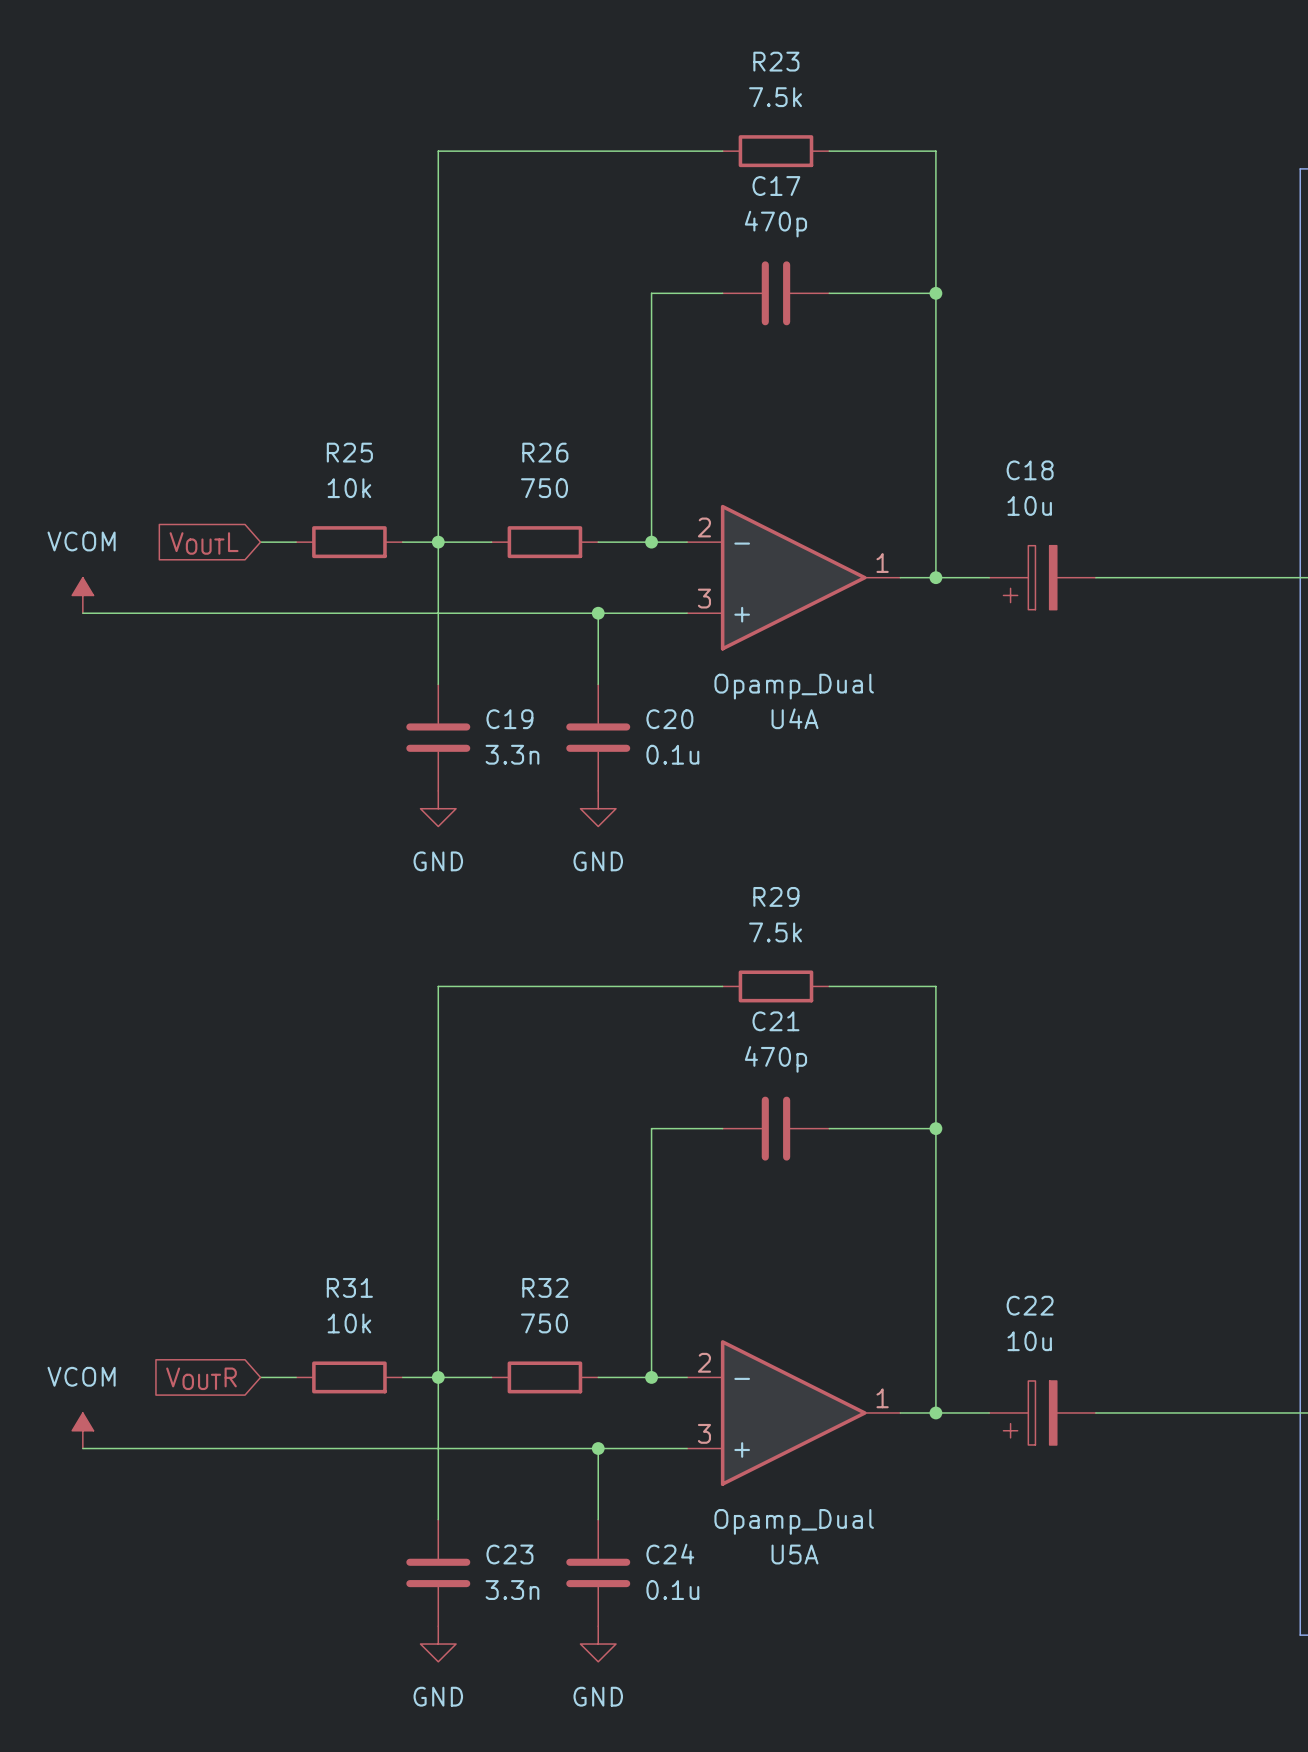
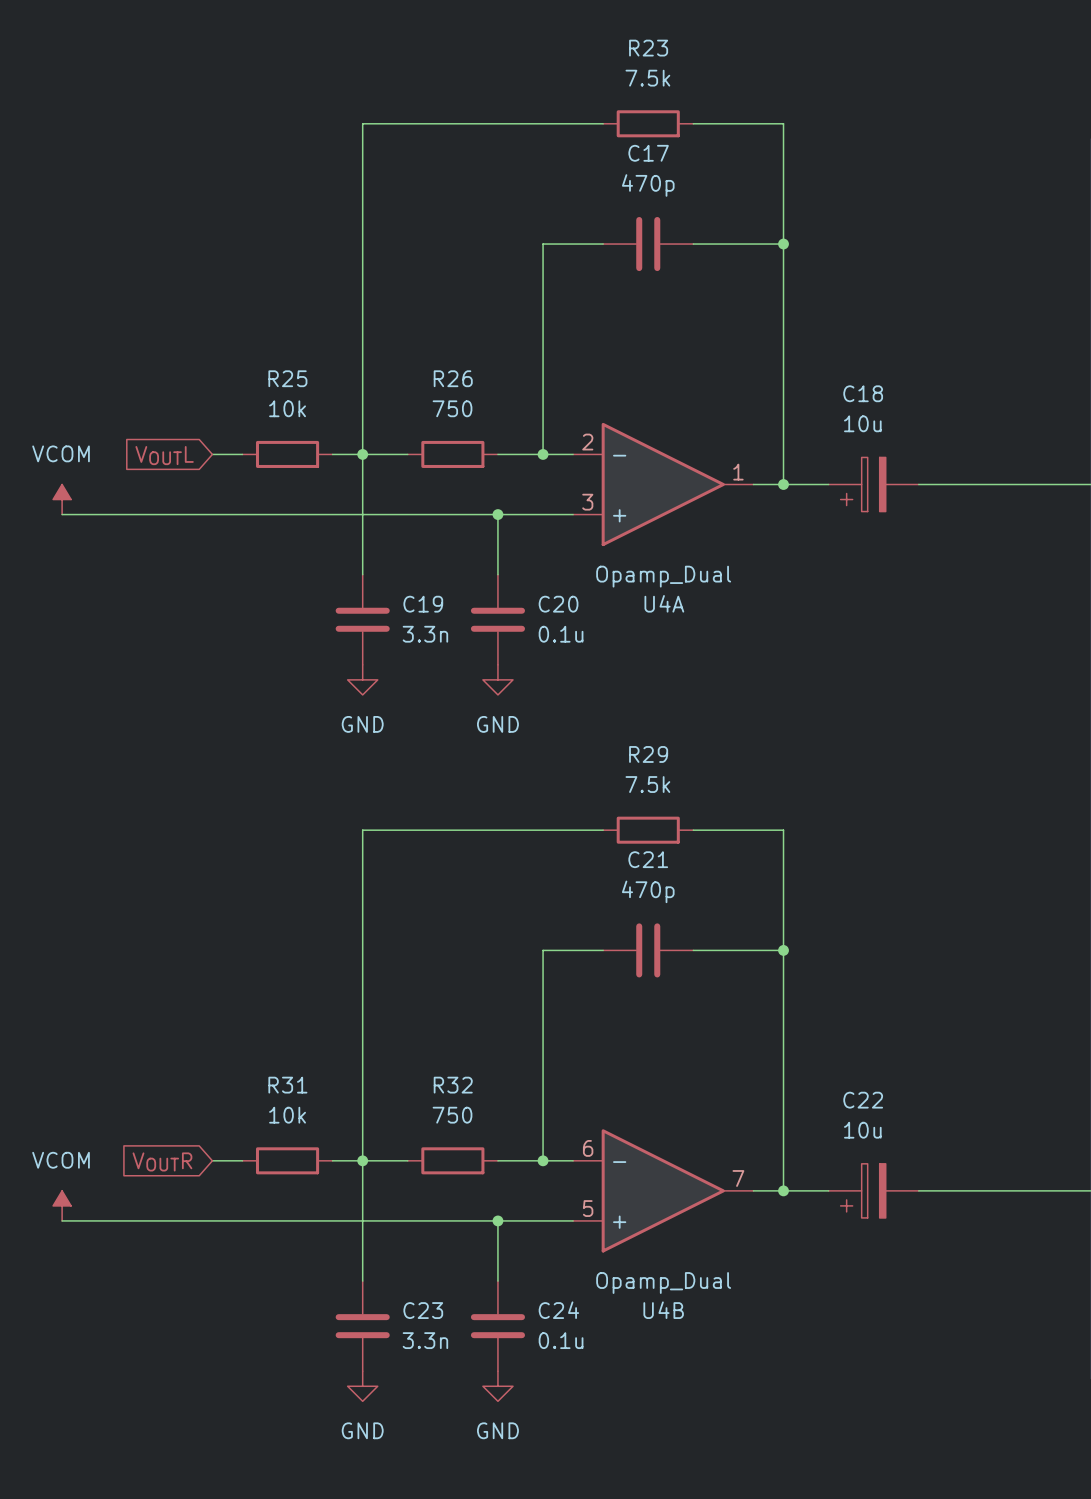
U5A pin number: 2 (704, 1362) -> 6 (588, 1148)
U5A pin number: 1 (882, 1398) -> 7 (738, 1178)
U5A pin number: 3 (704, 1433) -> 5 (588, 1208)
U5A name: U5A (795, 1554) -> U4B (663, 1310)

